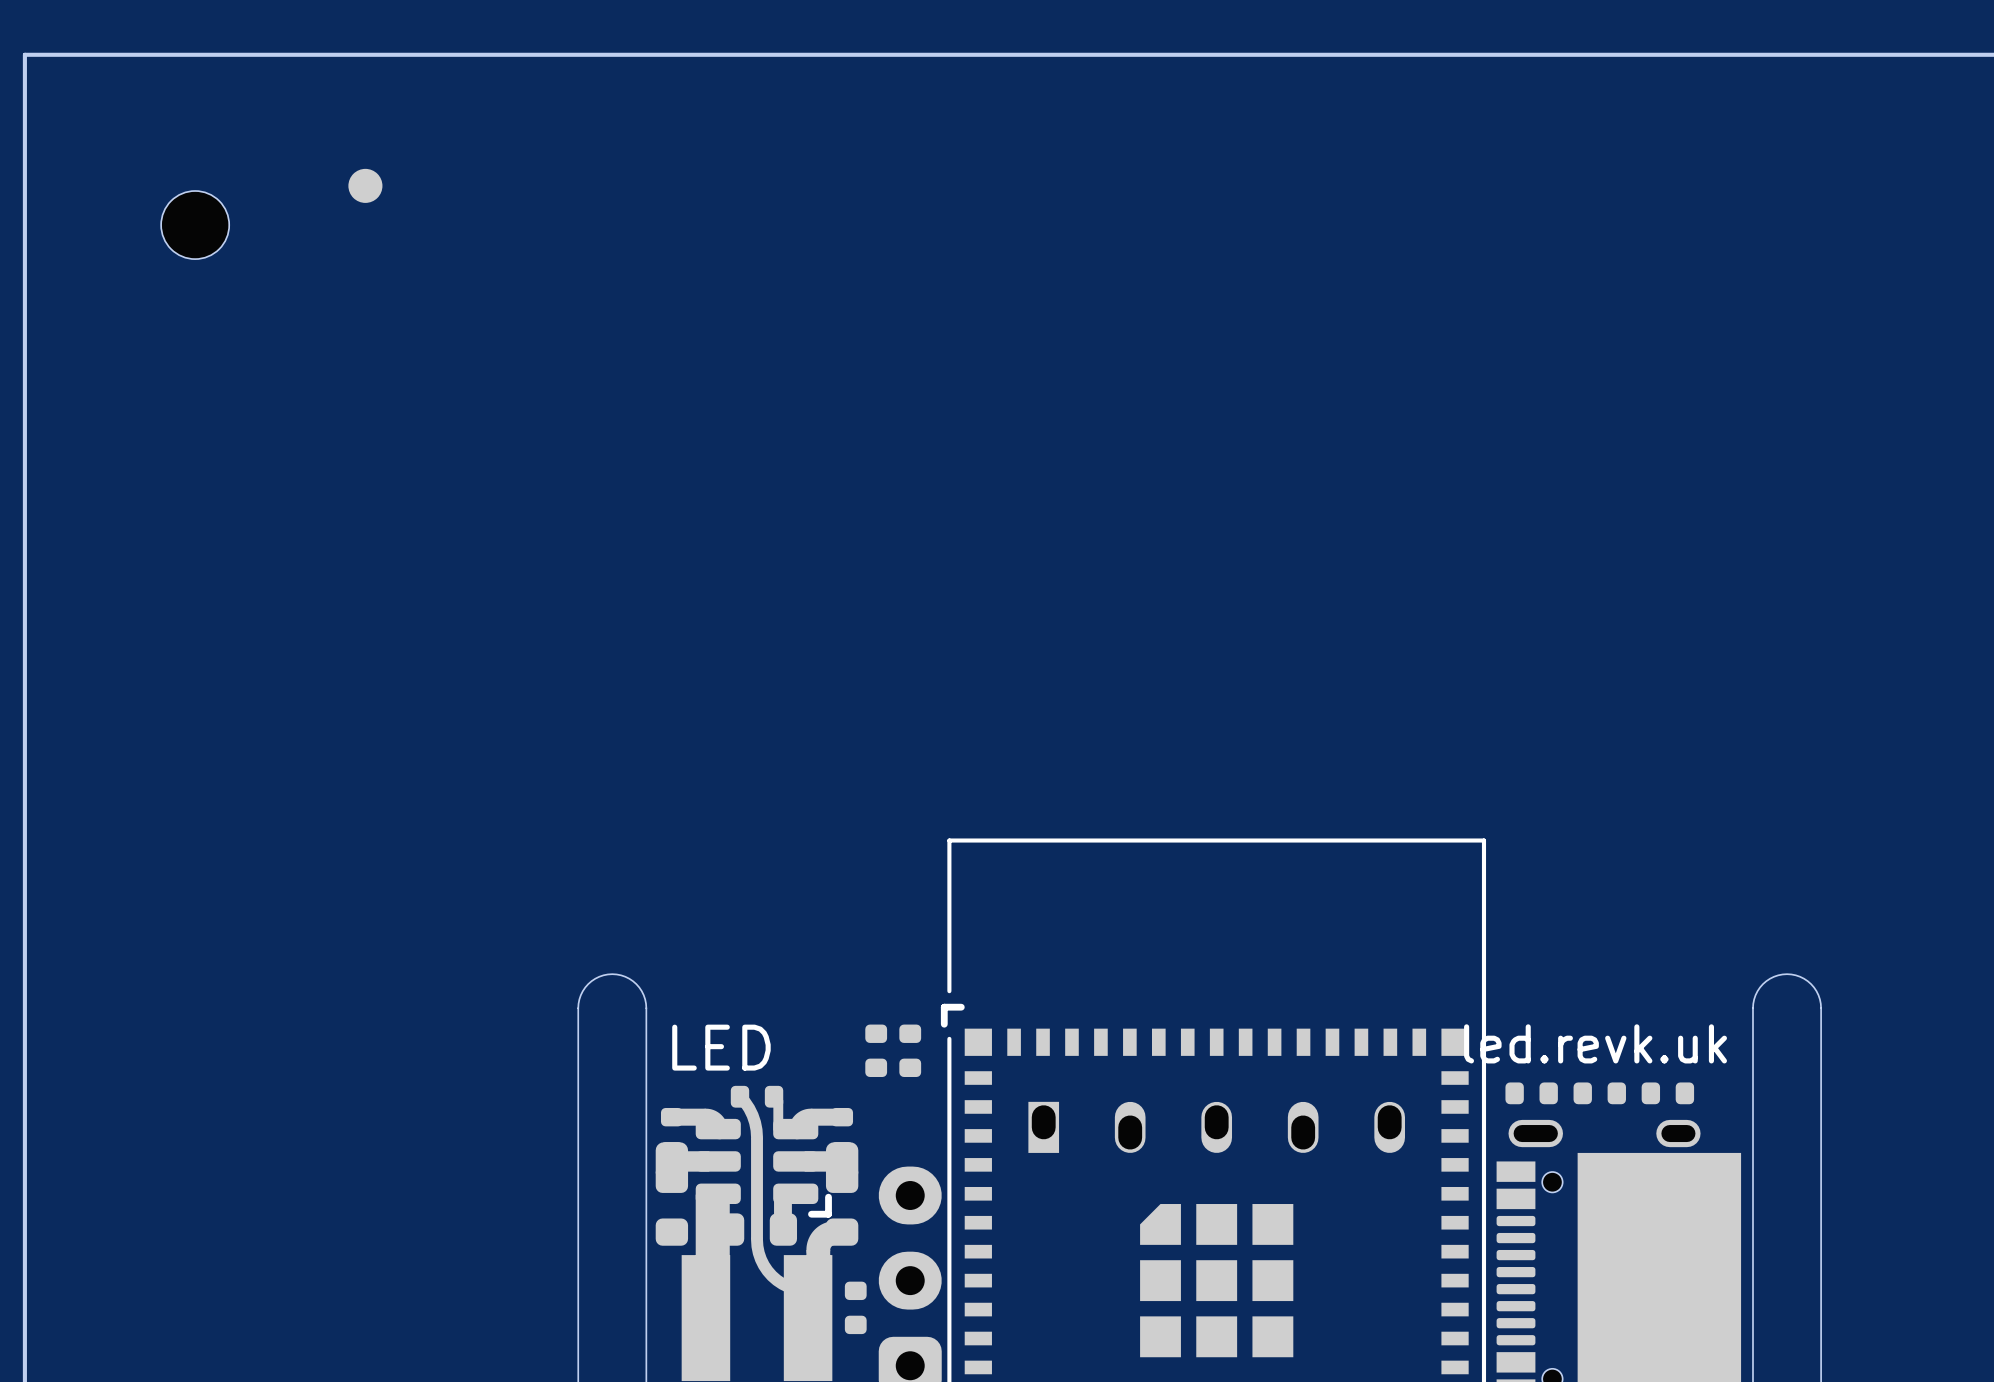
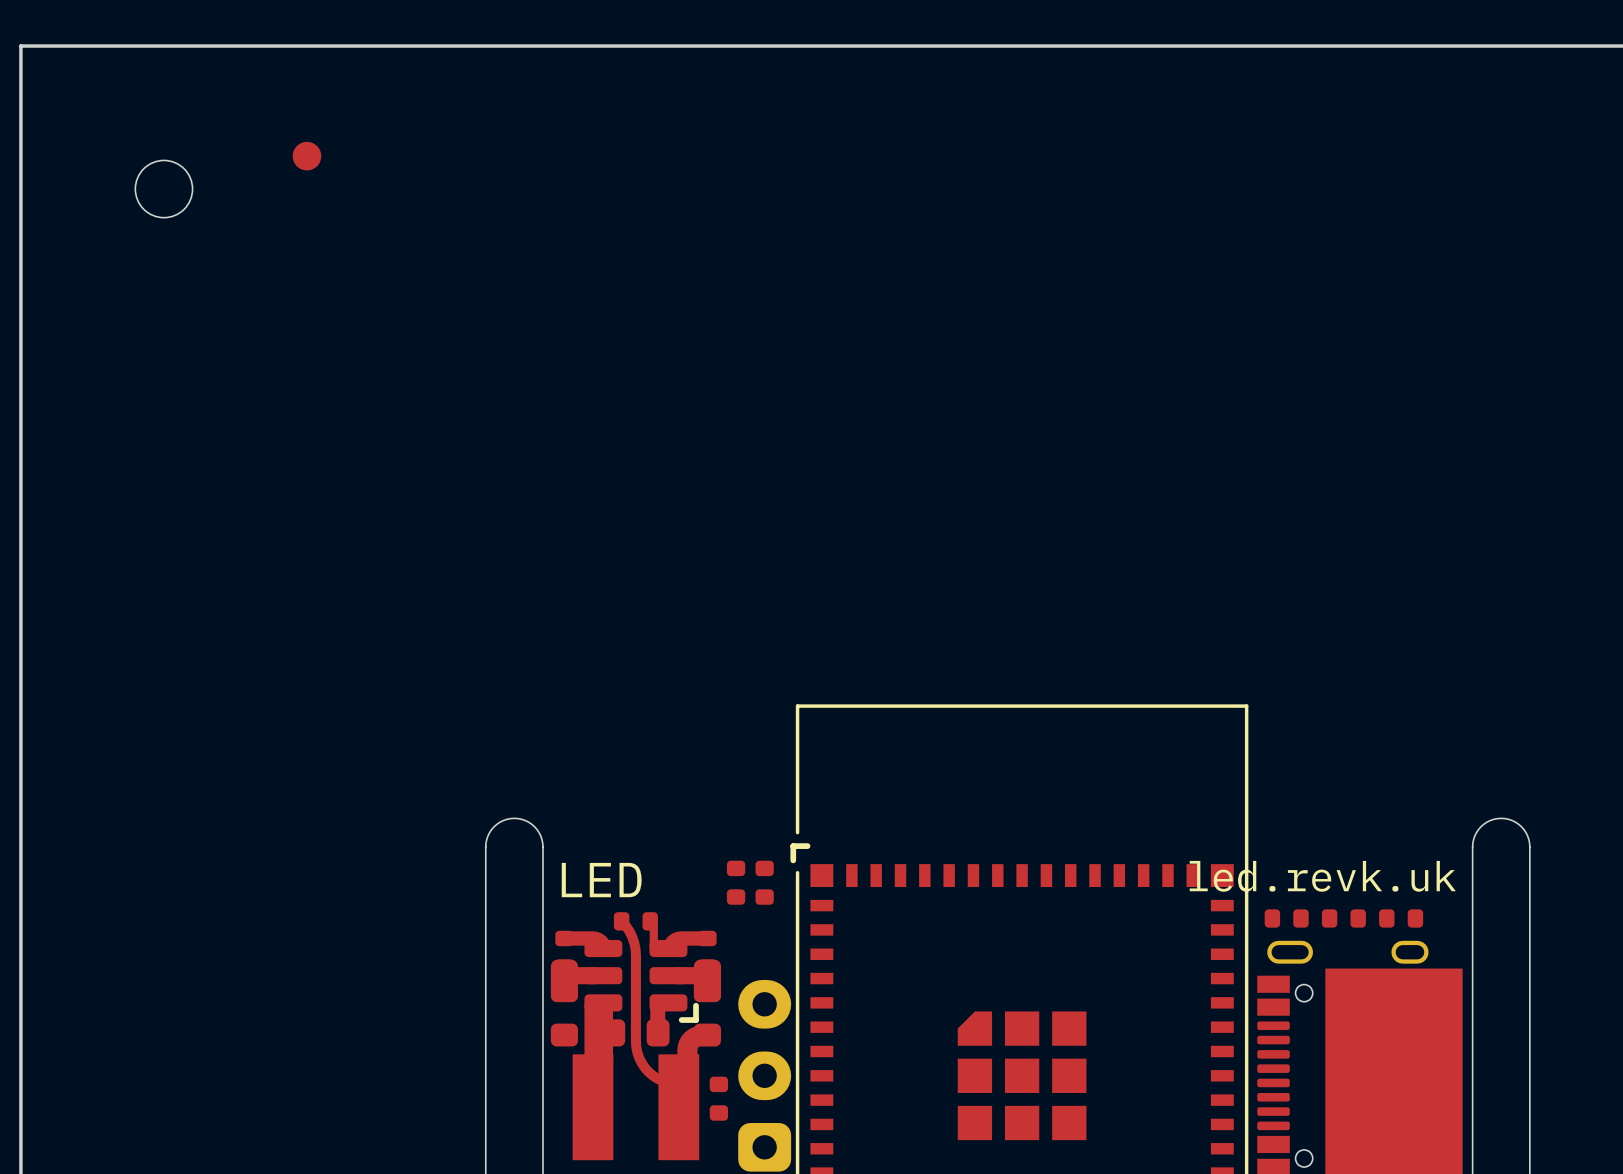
part: (1216, 1127) -> none

